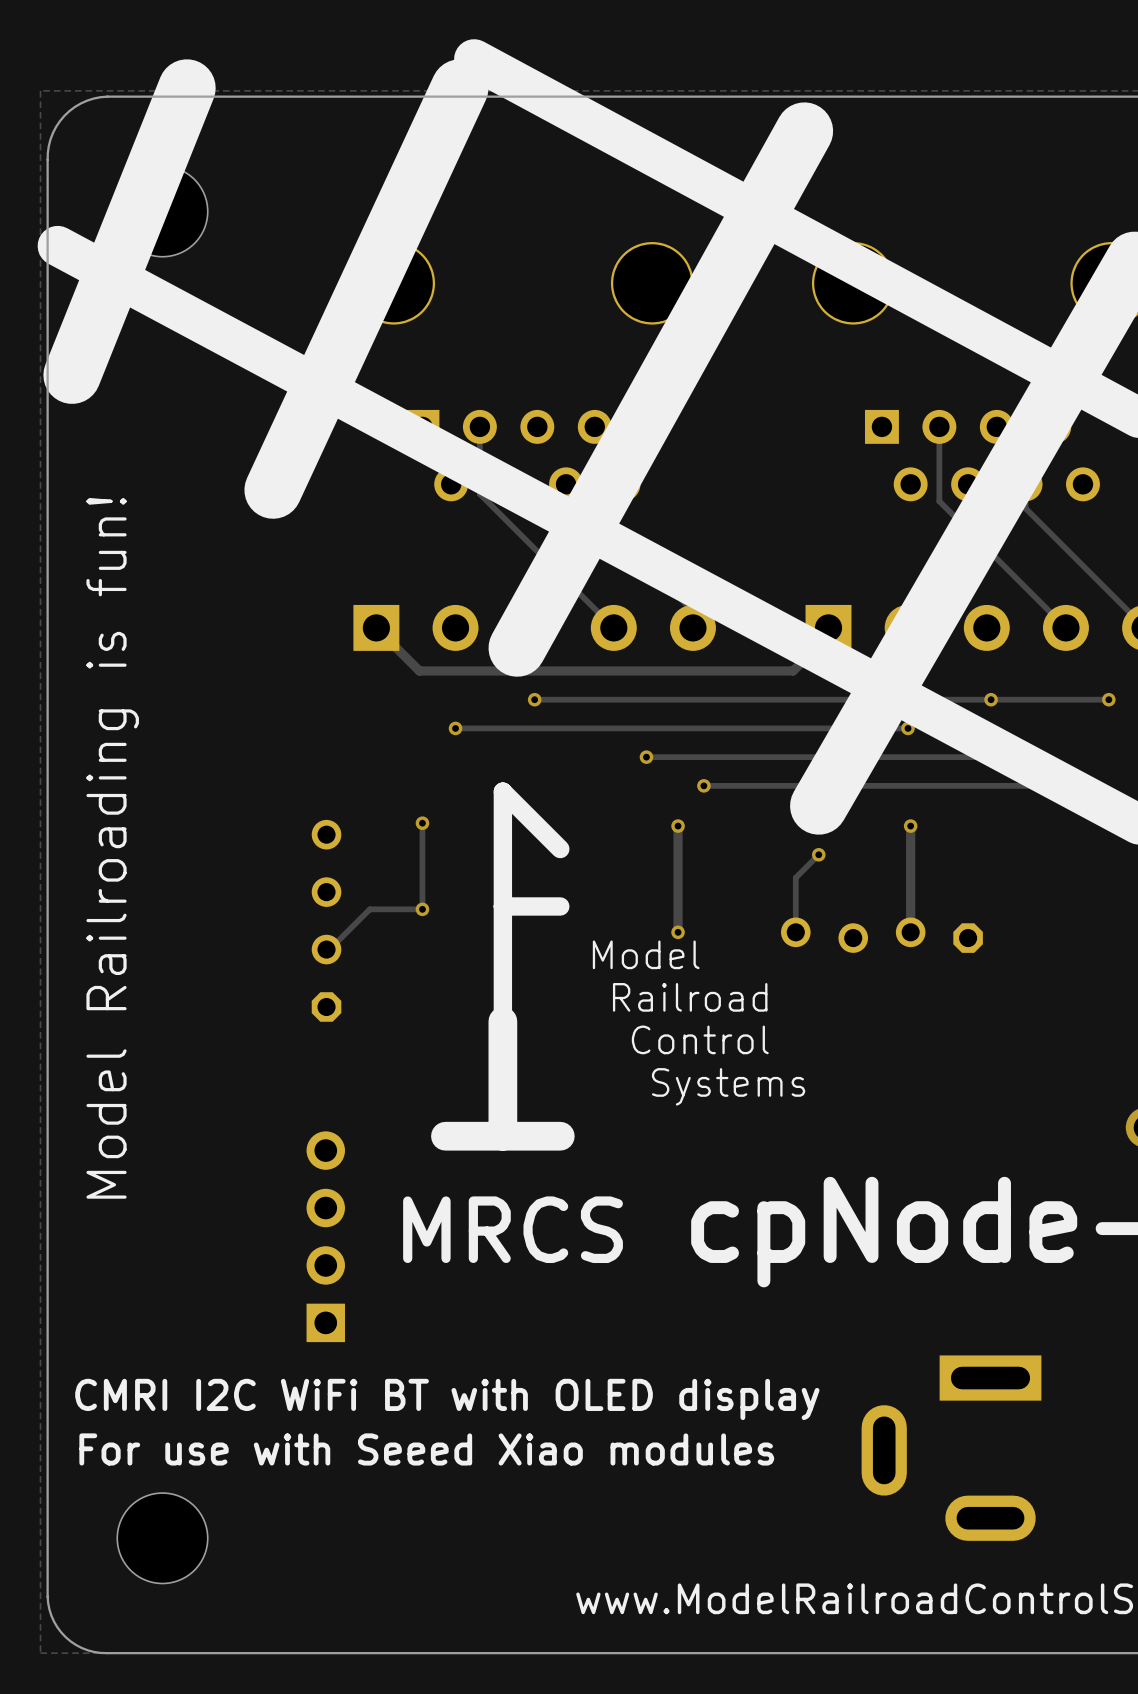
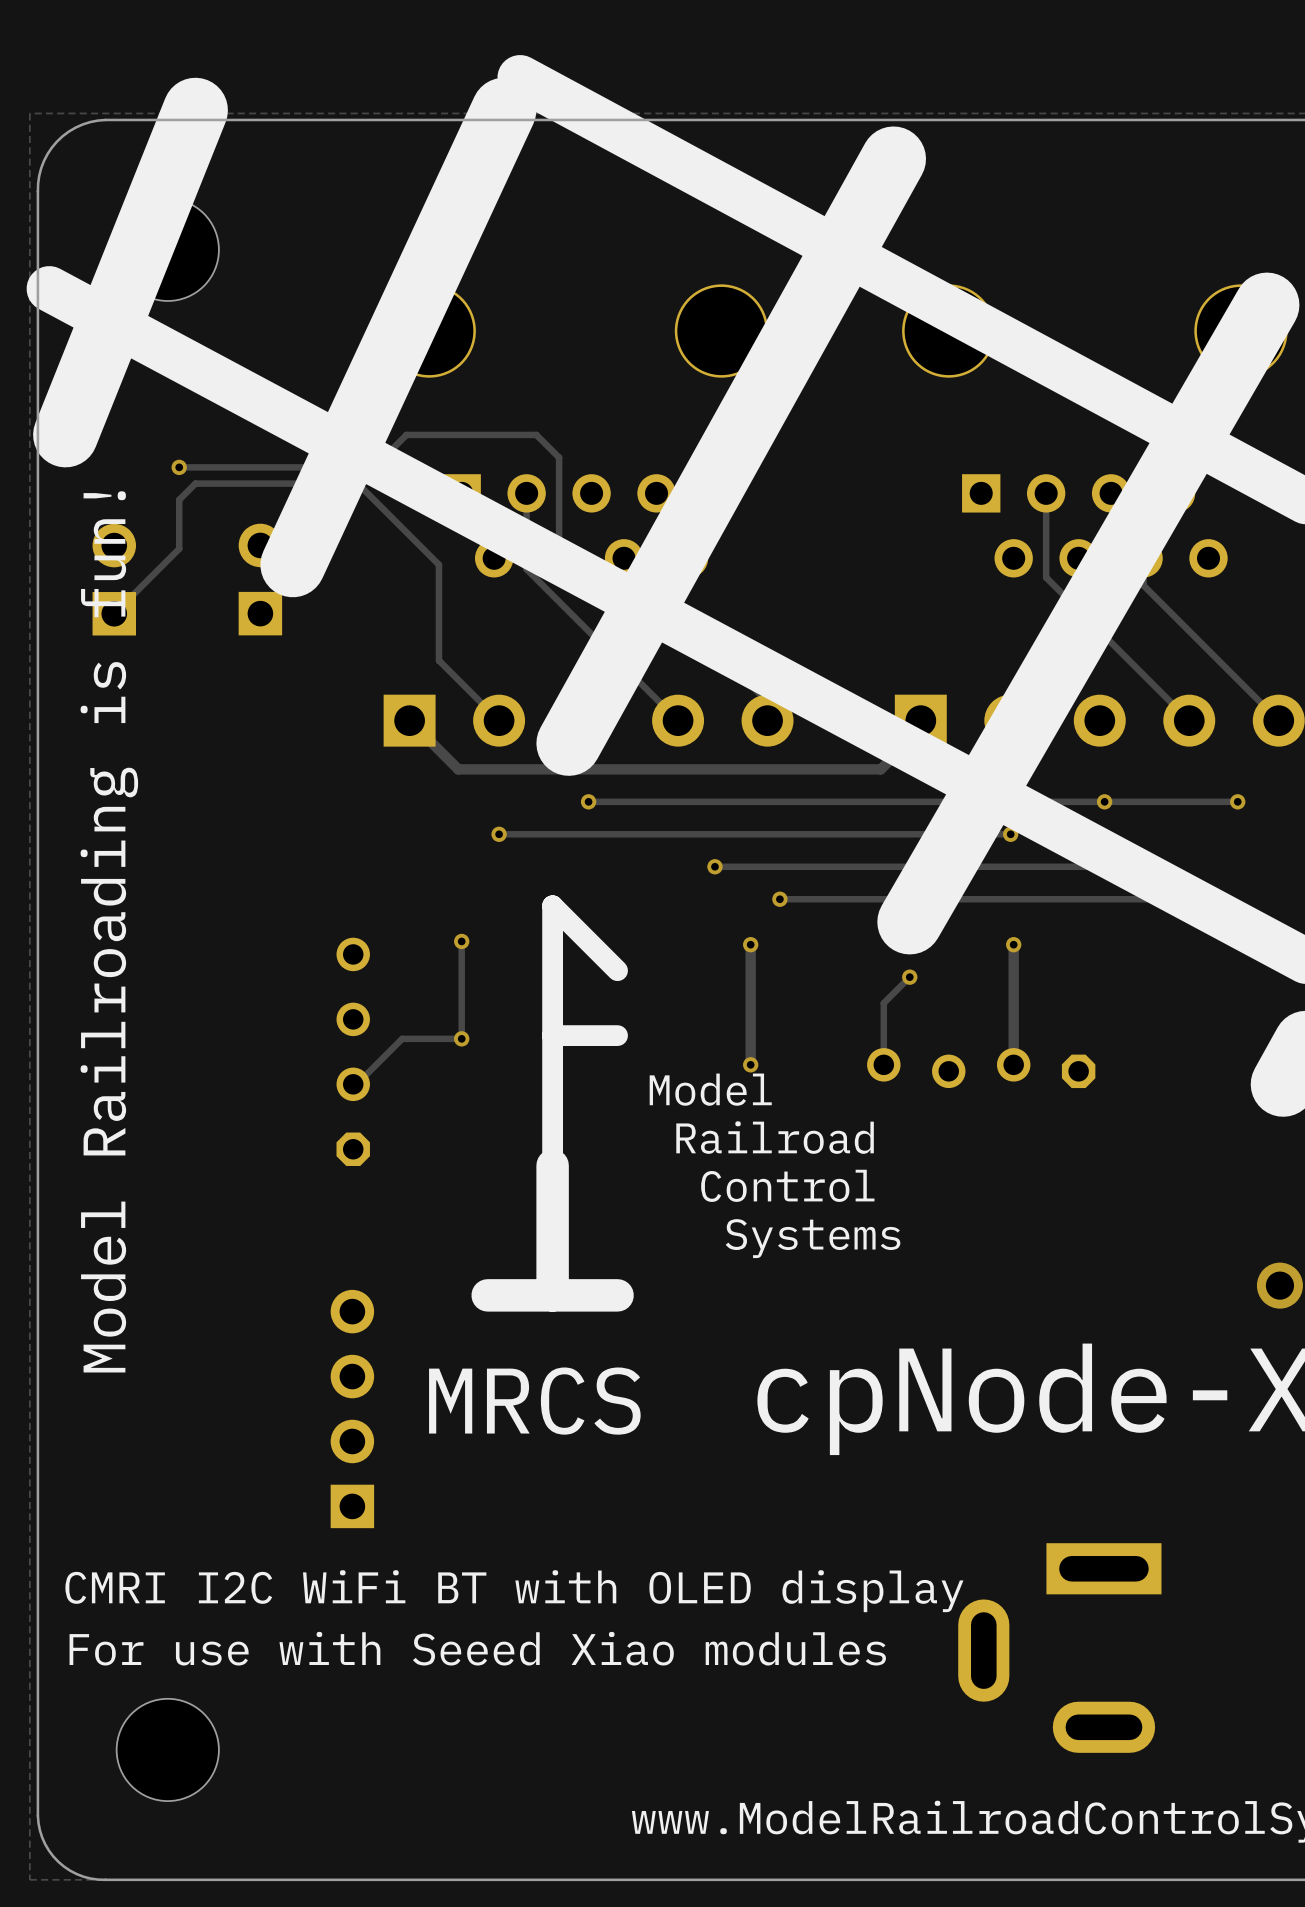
track: none -> (179, 467) (374, 467) (406, 434) (536, 434) (559, 457) (559, 558)
via: none -> (179, 467)
part: none -> (114, 579)
part: none -> (260, 579)
track: none -> (114, 613) (179, 548) (179, 499) (195, 483) (357, 483) (438, 564) (438, 660) (499, 720)

